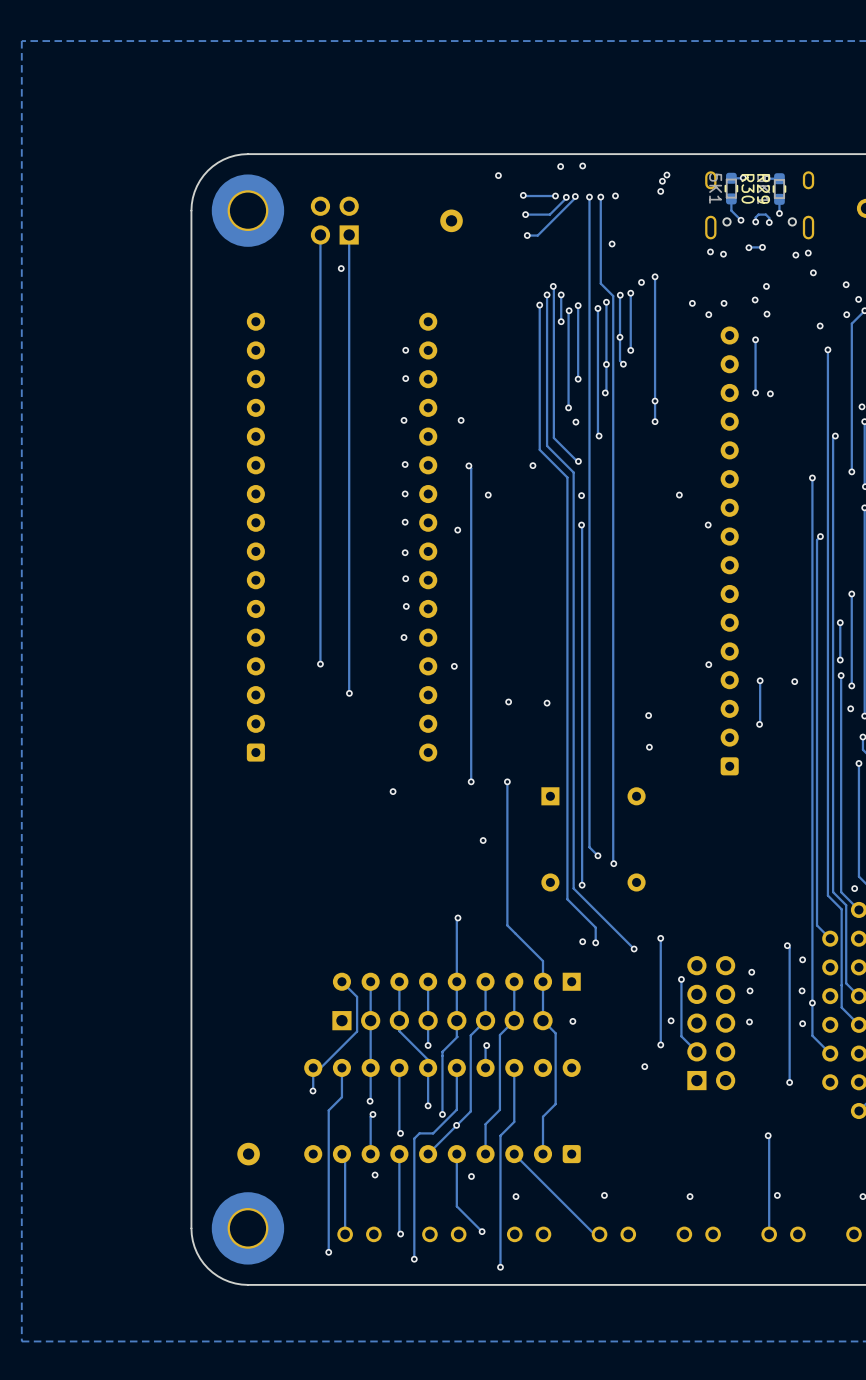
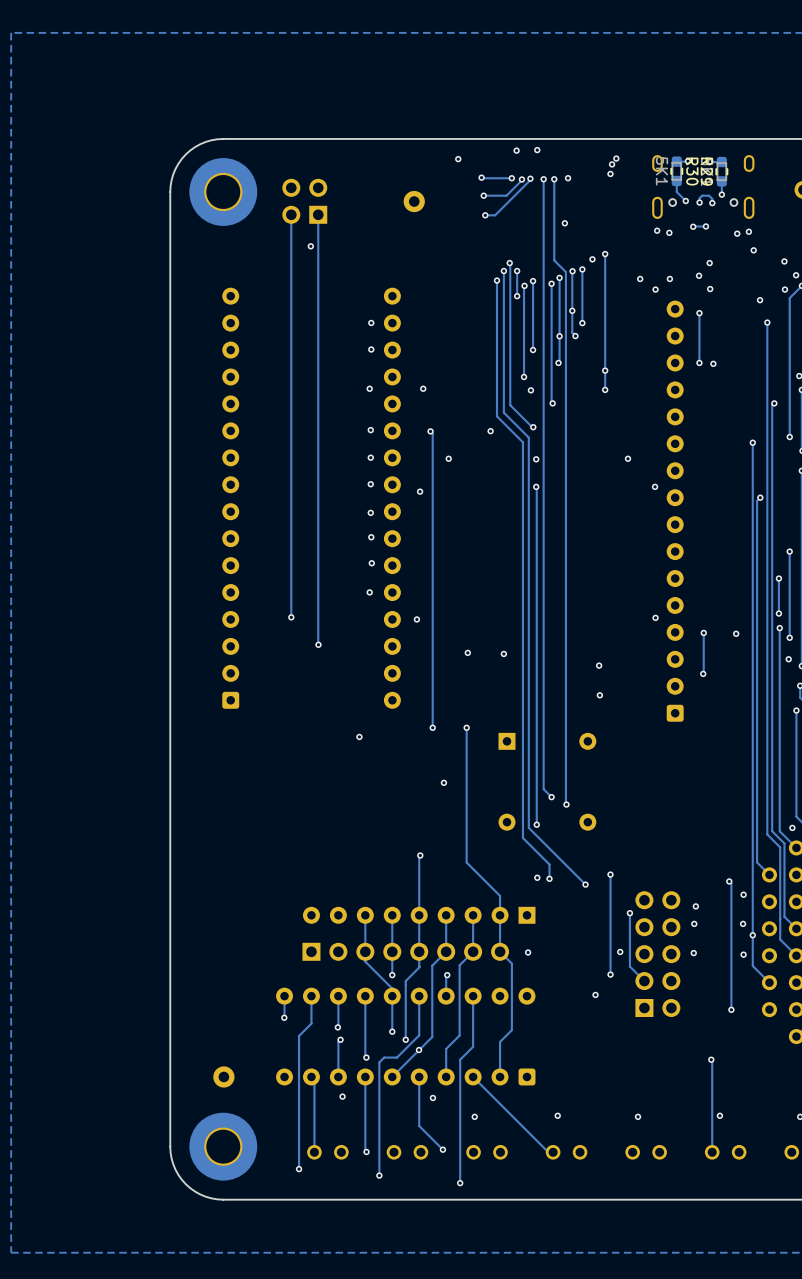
track: (341, 981) (357, 996) (357, 1031) (320, 1067) (313, 1067) -> none
track: (370, 981) (370, 1067) -> none

